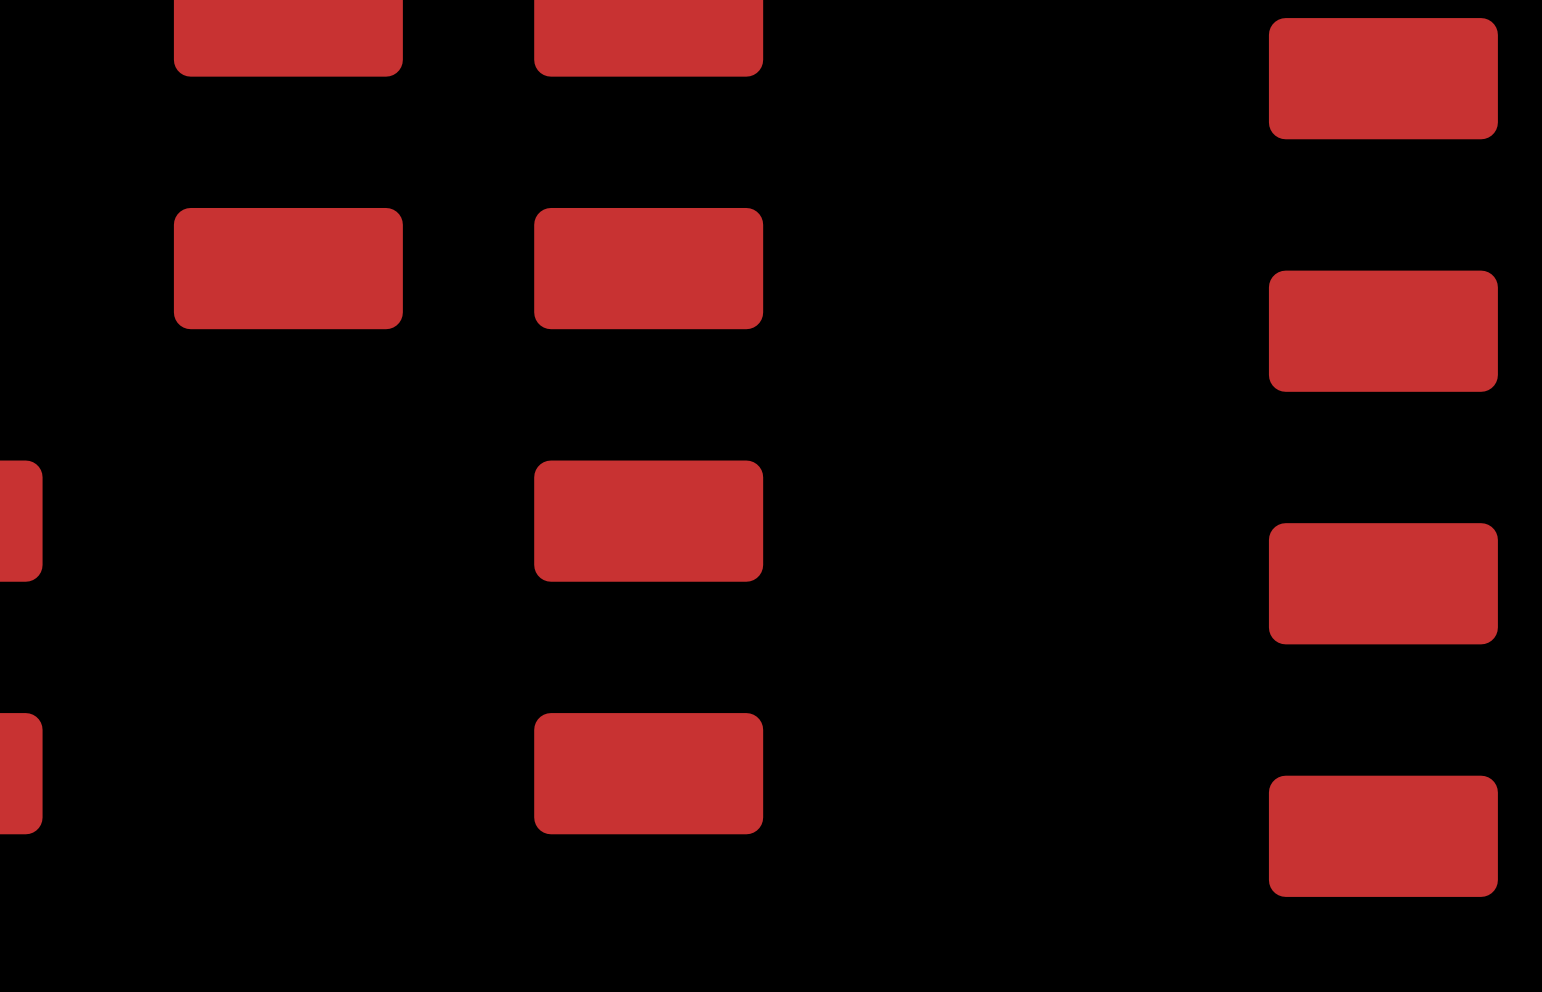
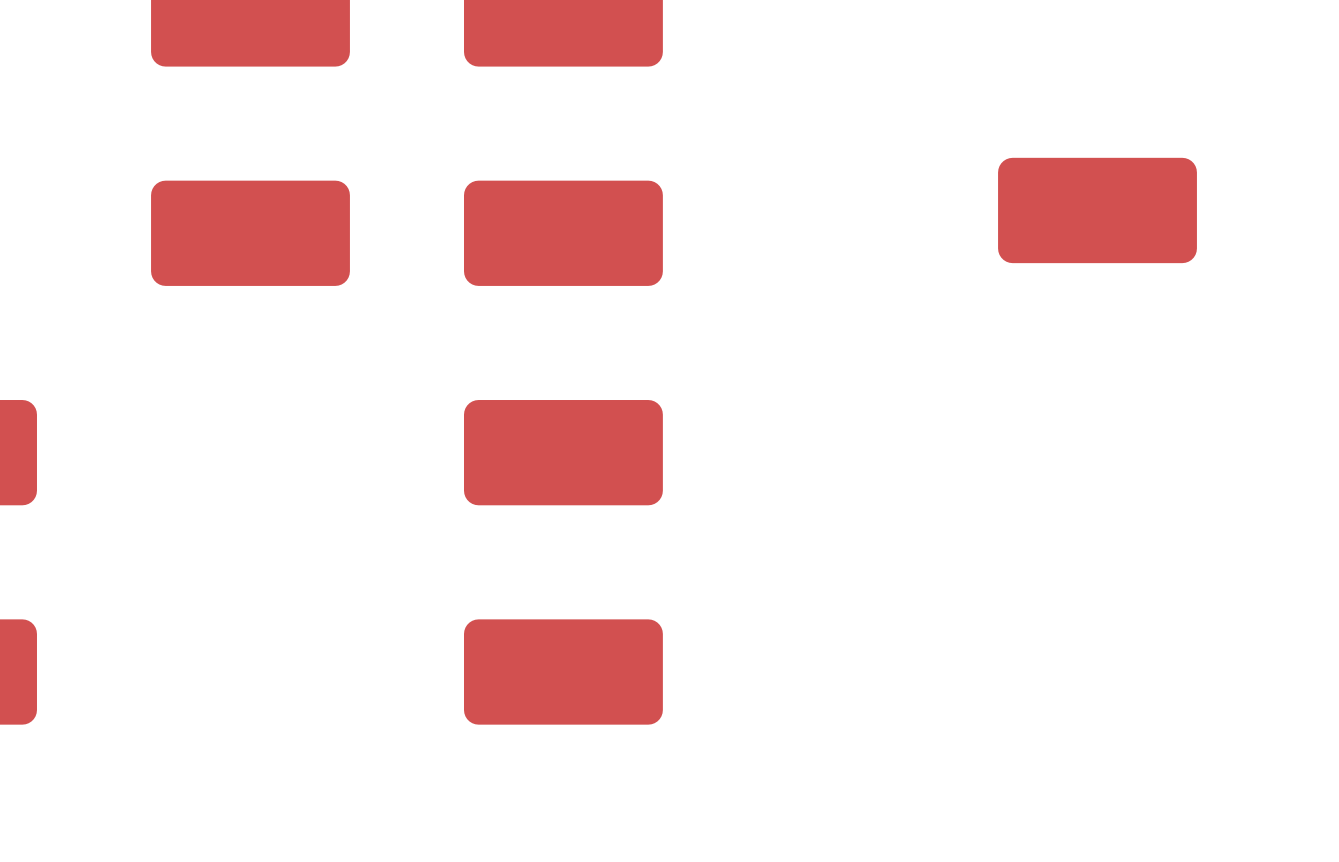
part: (1383, 78) -> none
part: none -> (1097, 210)
part: (1383, 331) -> none
part: (1383, 583) -> none
part: (1383, 836) -> none

